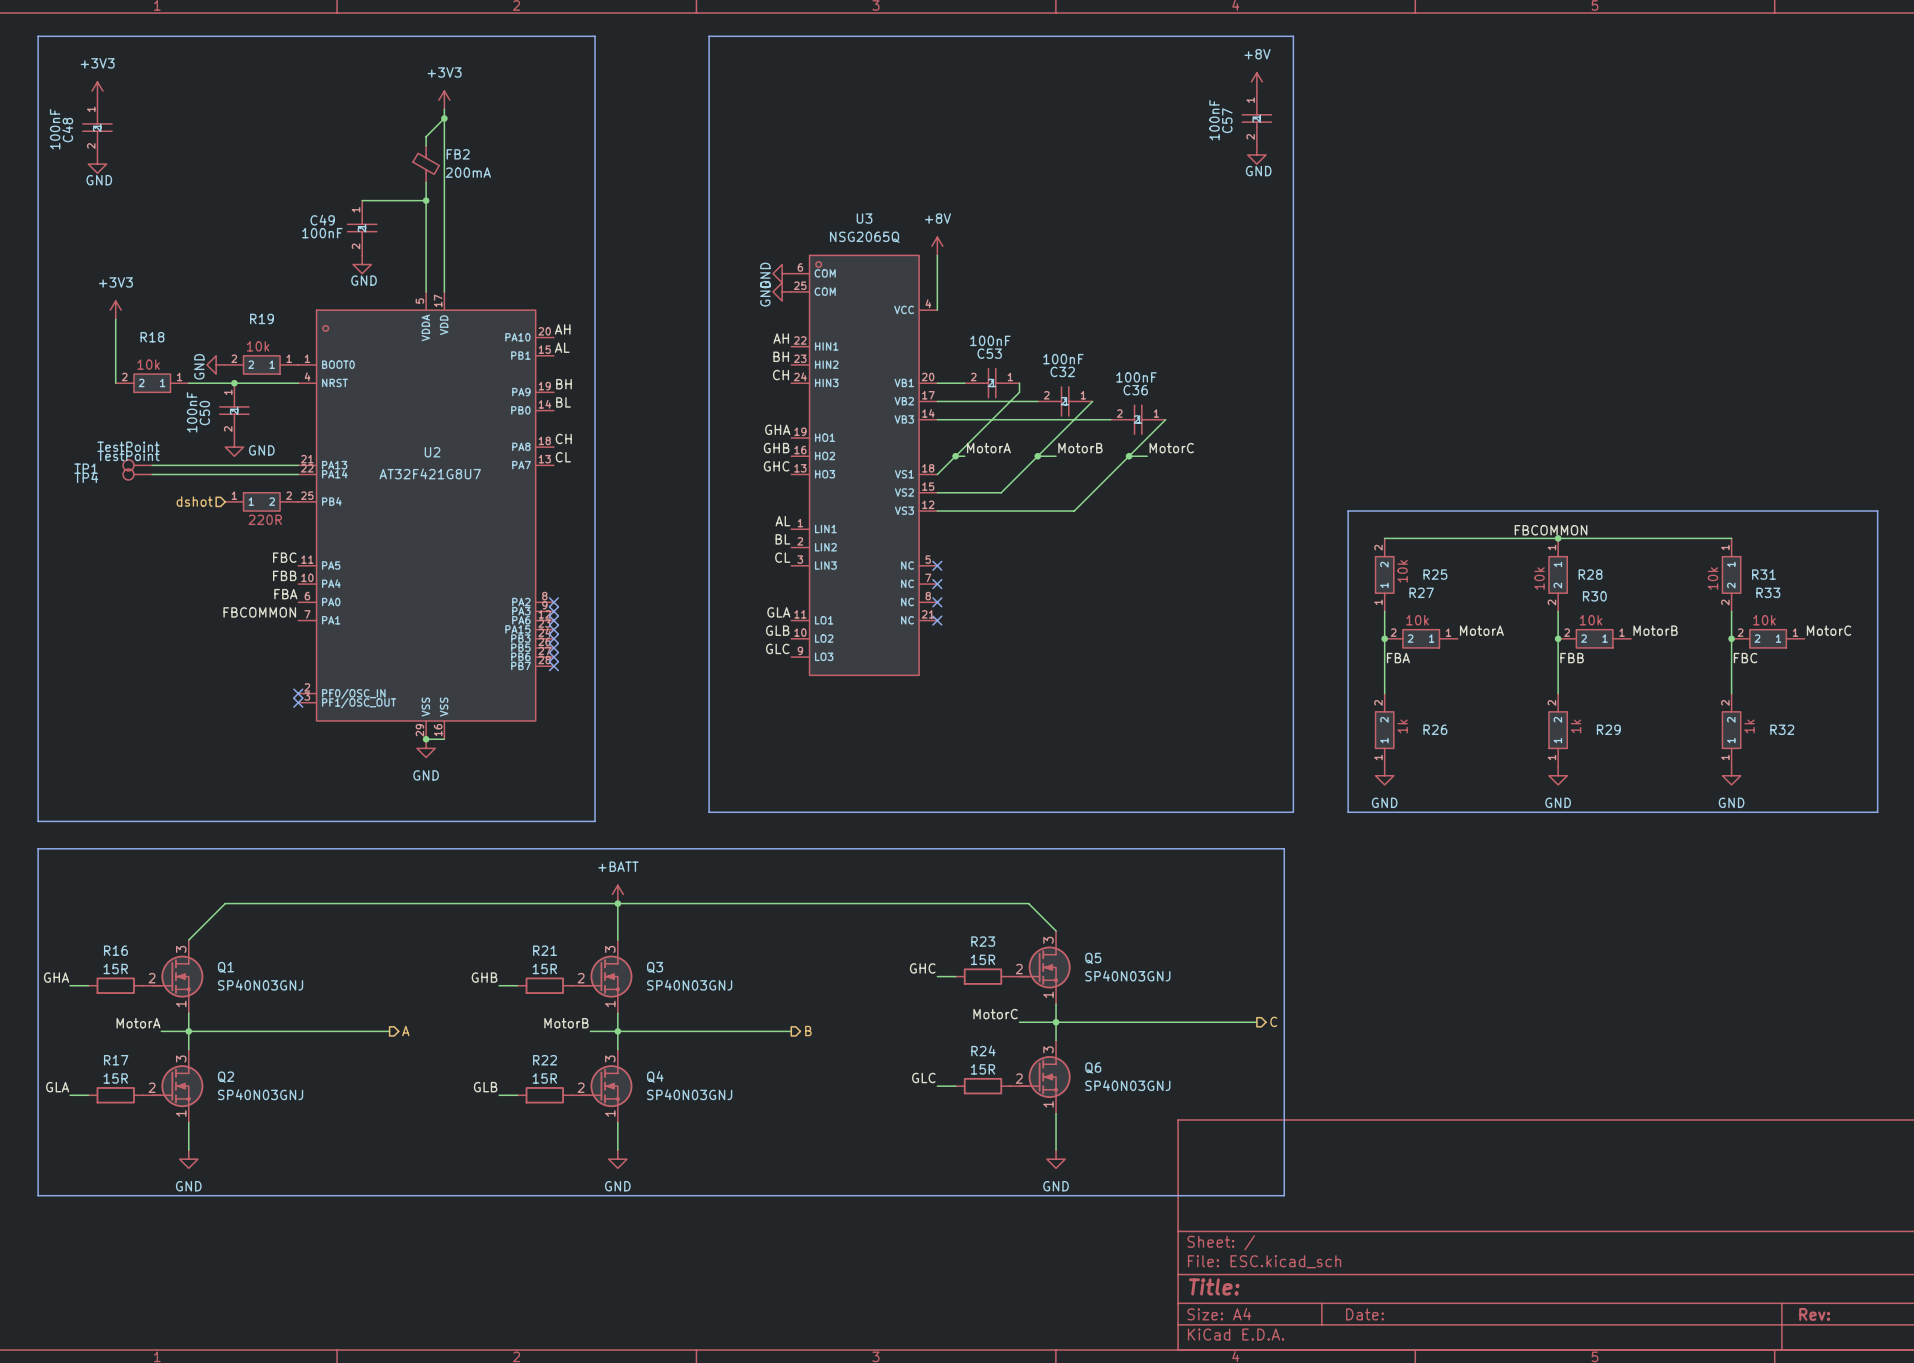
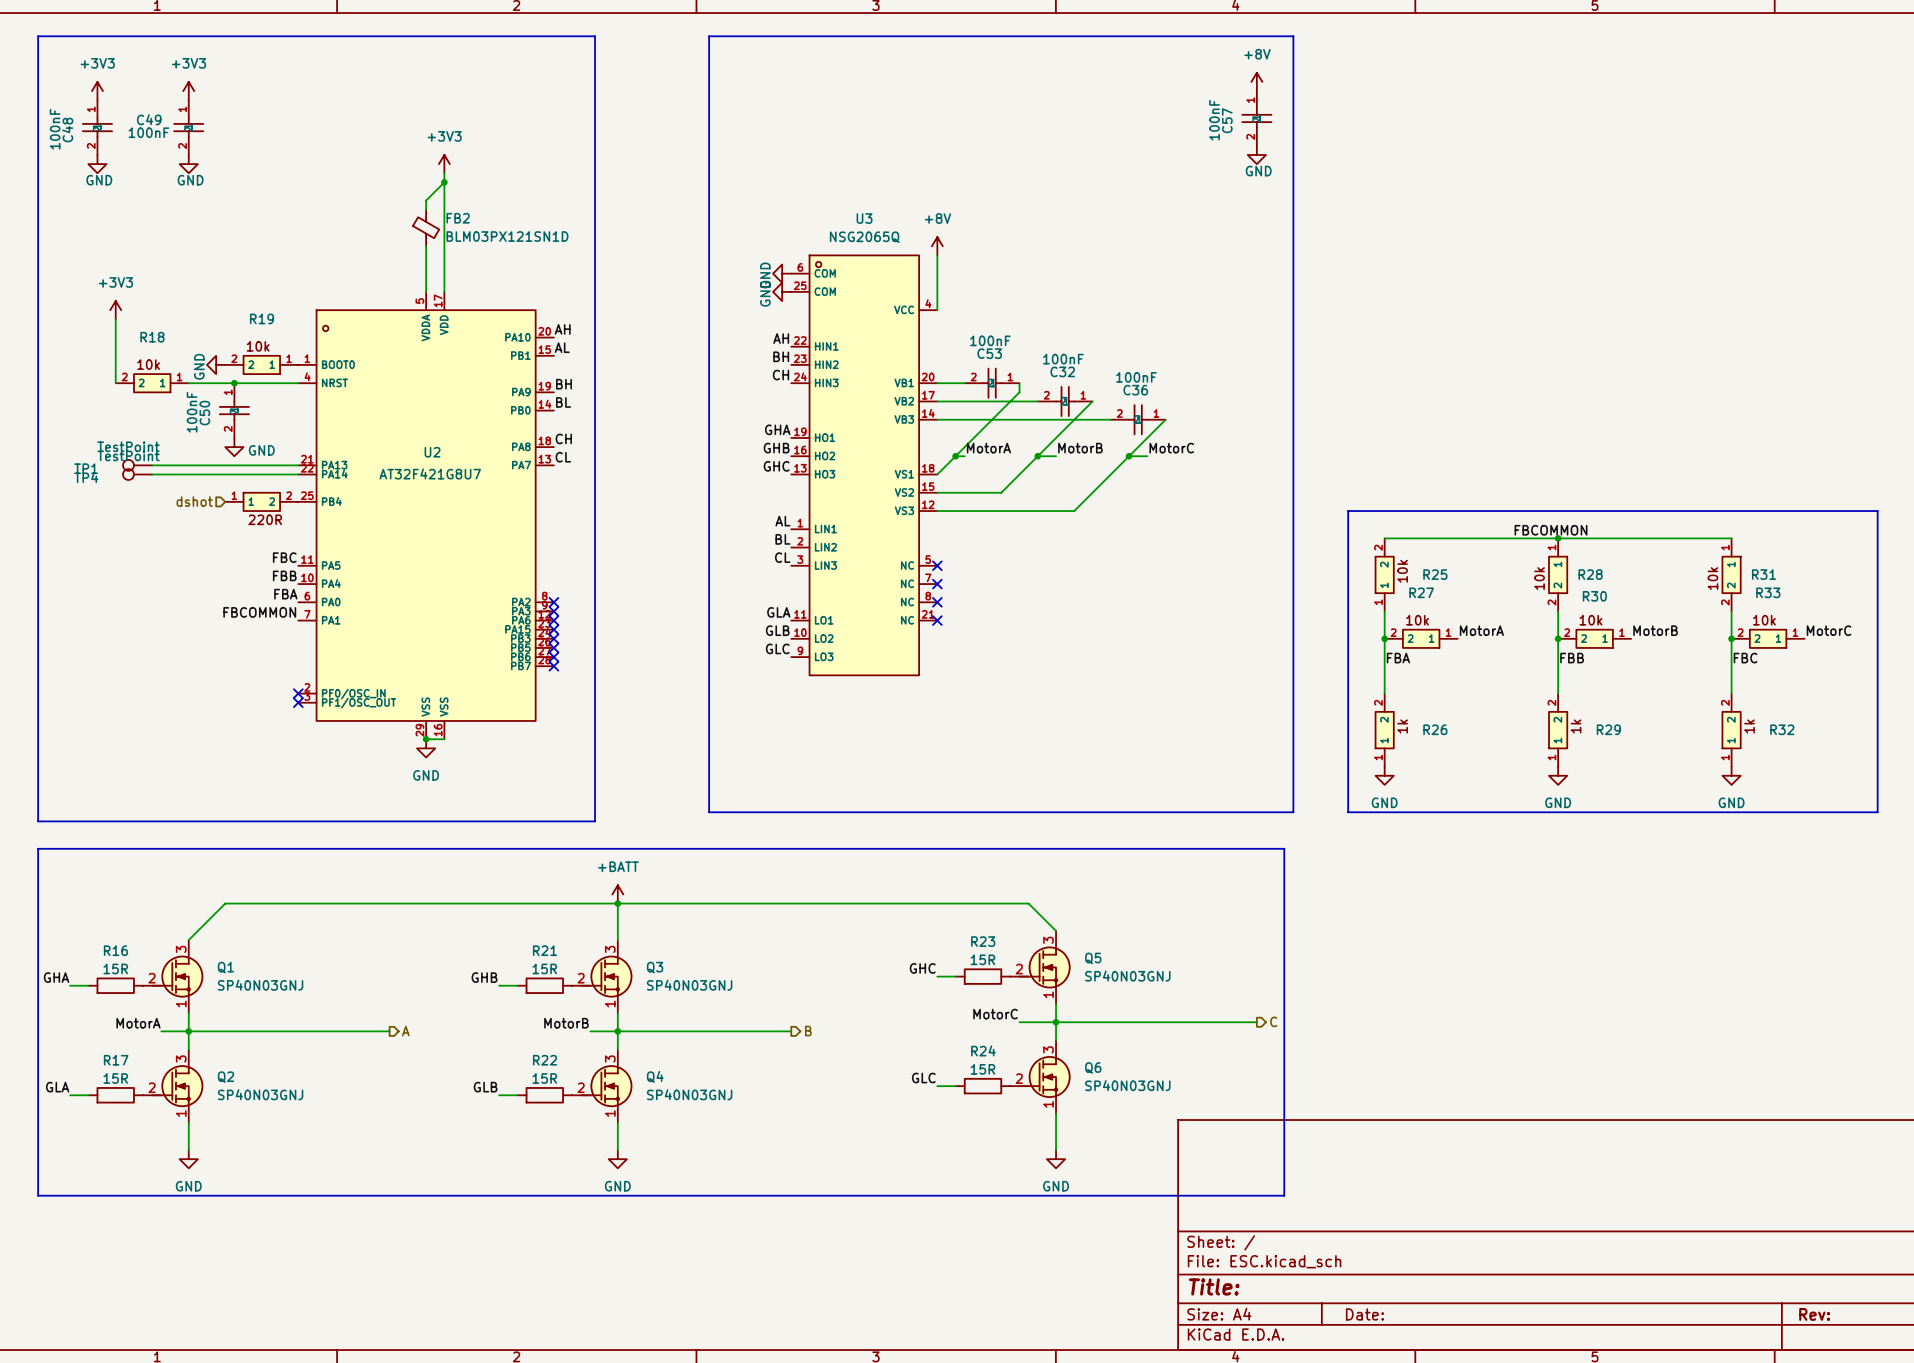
power symbol: none -> +3V3 (188, 91)
power symbol position: +3V3 (444, 100) -> +3V3 (444, 164)
wire: (444, 109) (444, 173) -> none
wire: (444, 118) (426, 136) (426, 145) -> none
junction: (444, 118) -> none
power symbol: none -> GND (188, 164)
FB2 position: (426, 164) -> (426, 228)
FB2 value: 200mA (468, 172) -> BLM03PX121SN1D (507, 236)
wire: (426, 182) (426, 200) (362, 200) -> none
wire: none -> (444, 182) (426, 200)
junction position: (426, 200) -> (444, 182)
C49 position: (362, 228) -> (188, 127)
power symbol: GND (362, 264) -> none

